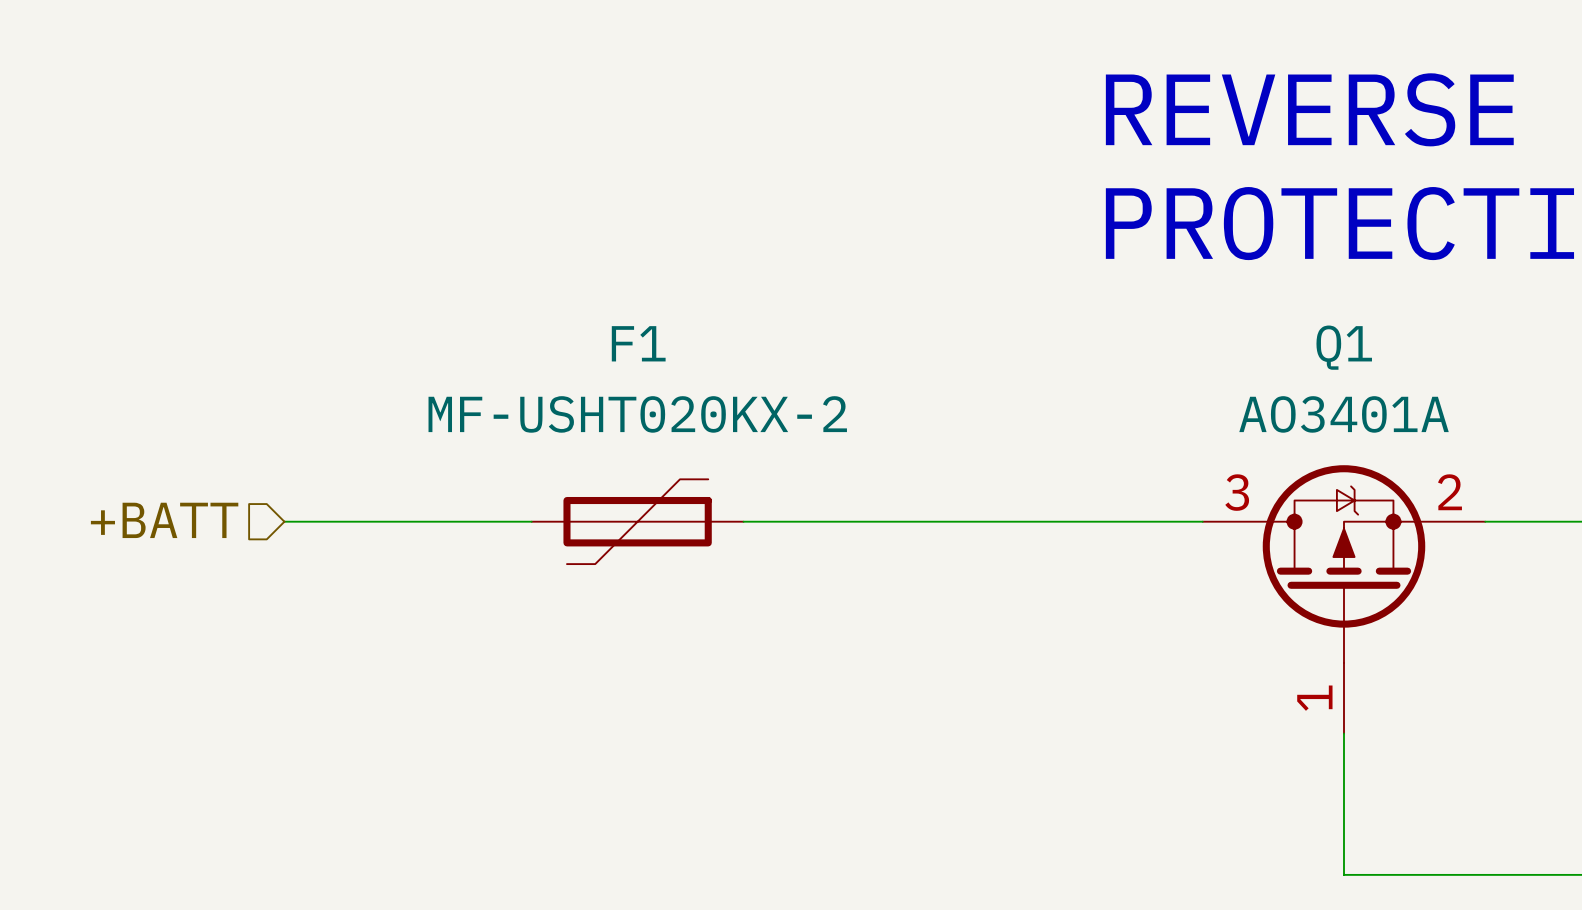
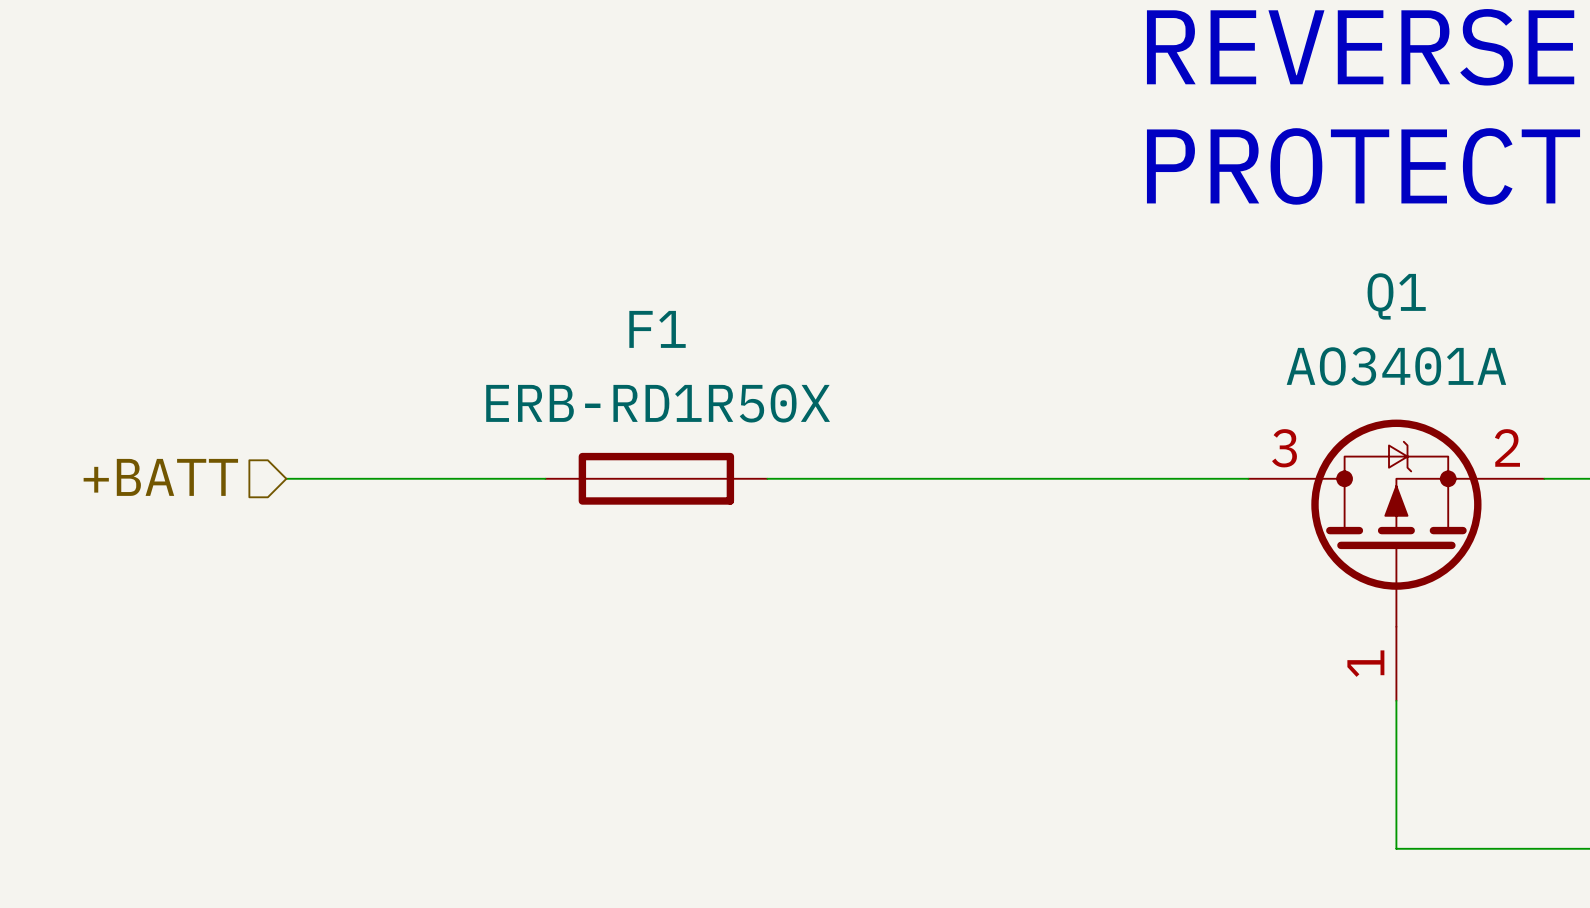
F1 name position: F1 (638, 343) -> F1 (657, 329)
F1 value: MF-USHT020KX-2 (637, 414) -> ERB-RD1R50X (658, 403)
F1 symbol: [531, 479, 744, 565] -> [545, 452, 768, 505]

